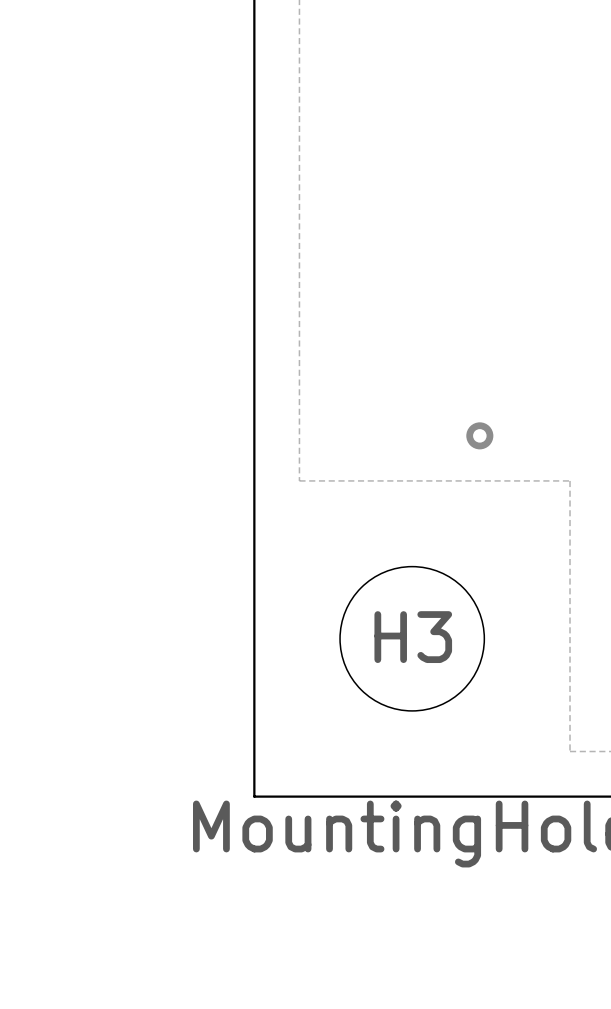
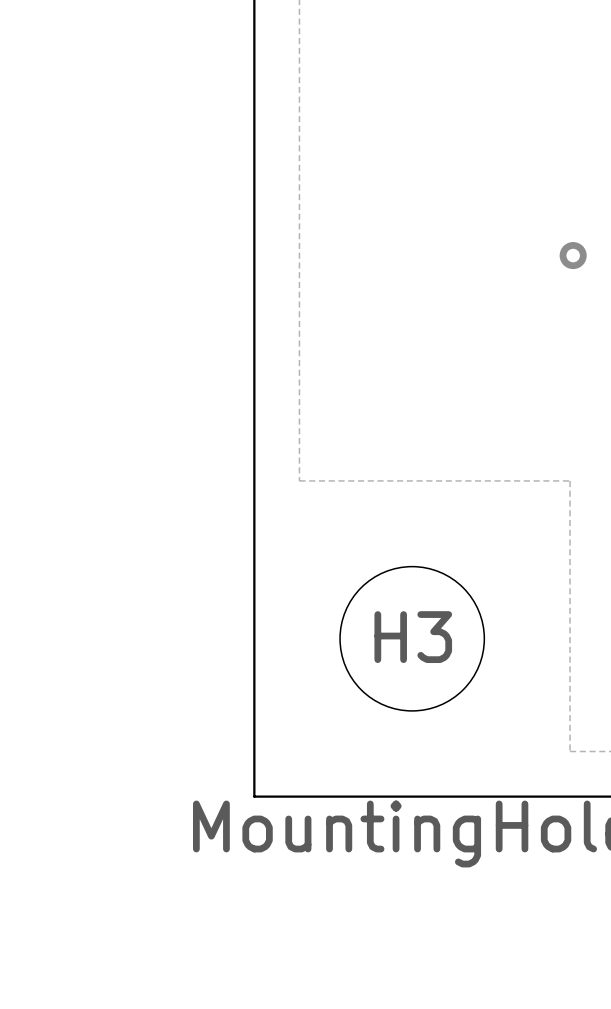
via: none -> (573, 255)
via: (479, 435) -> none

